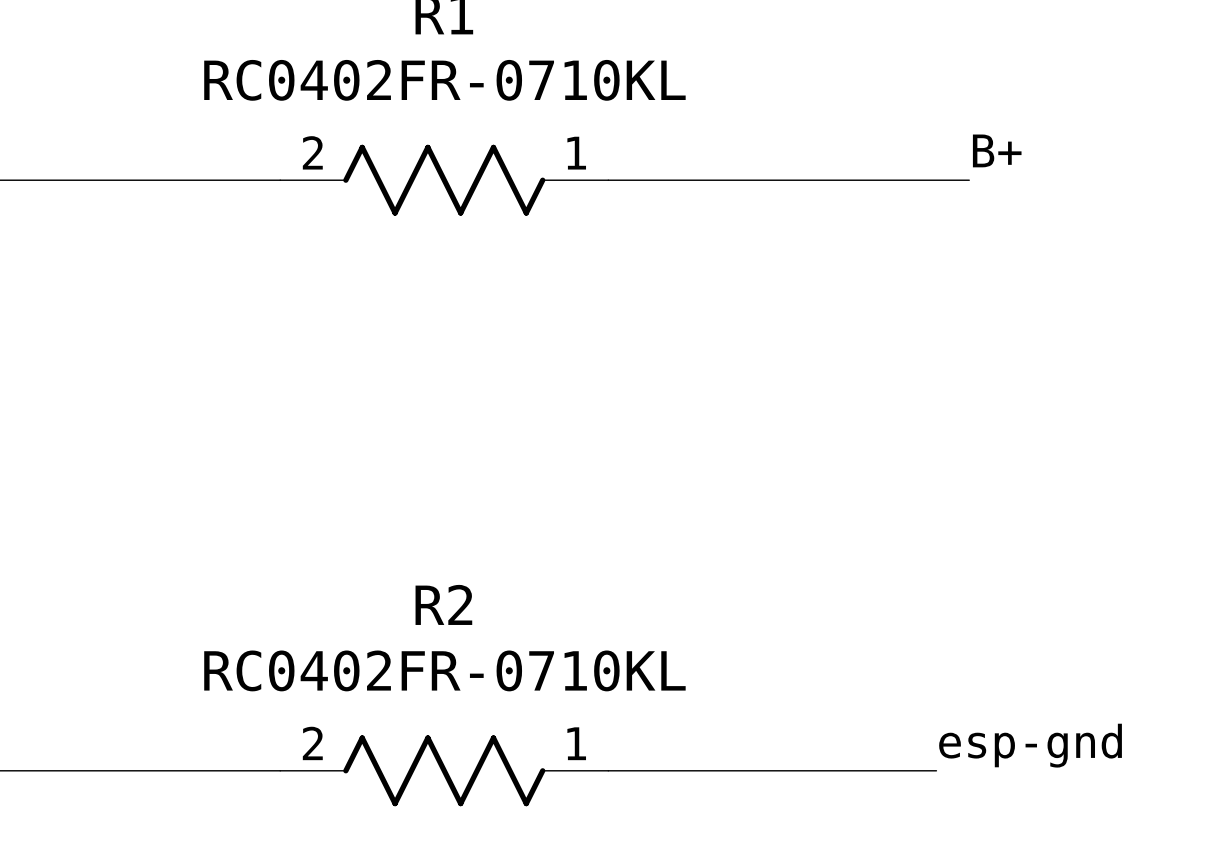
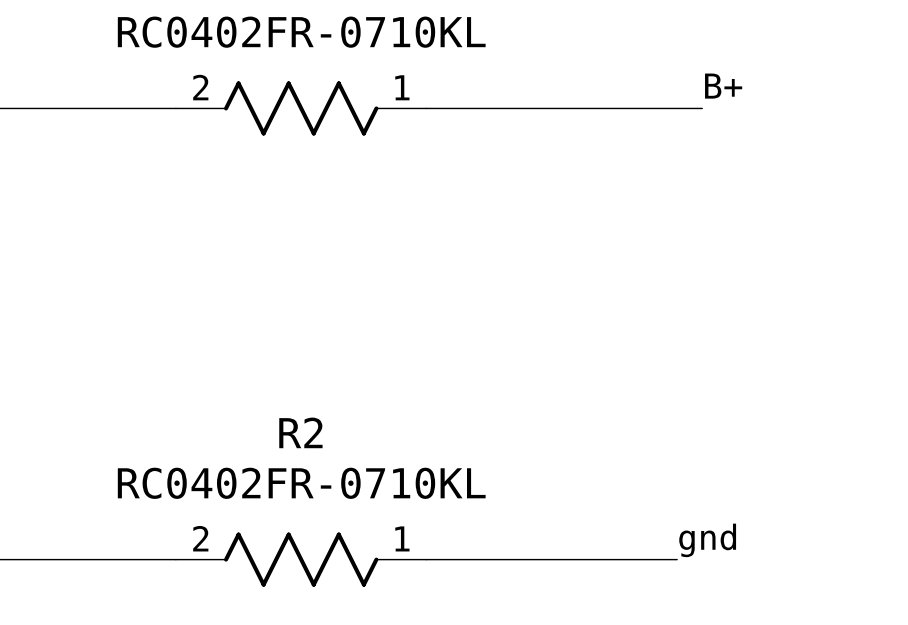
label: esp-gnd (1030, 745) -> gnd (707, 540)

